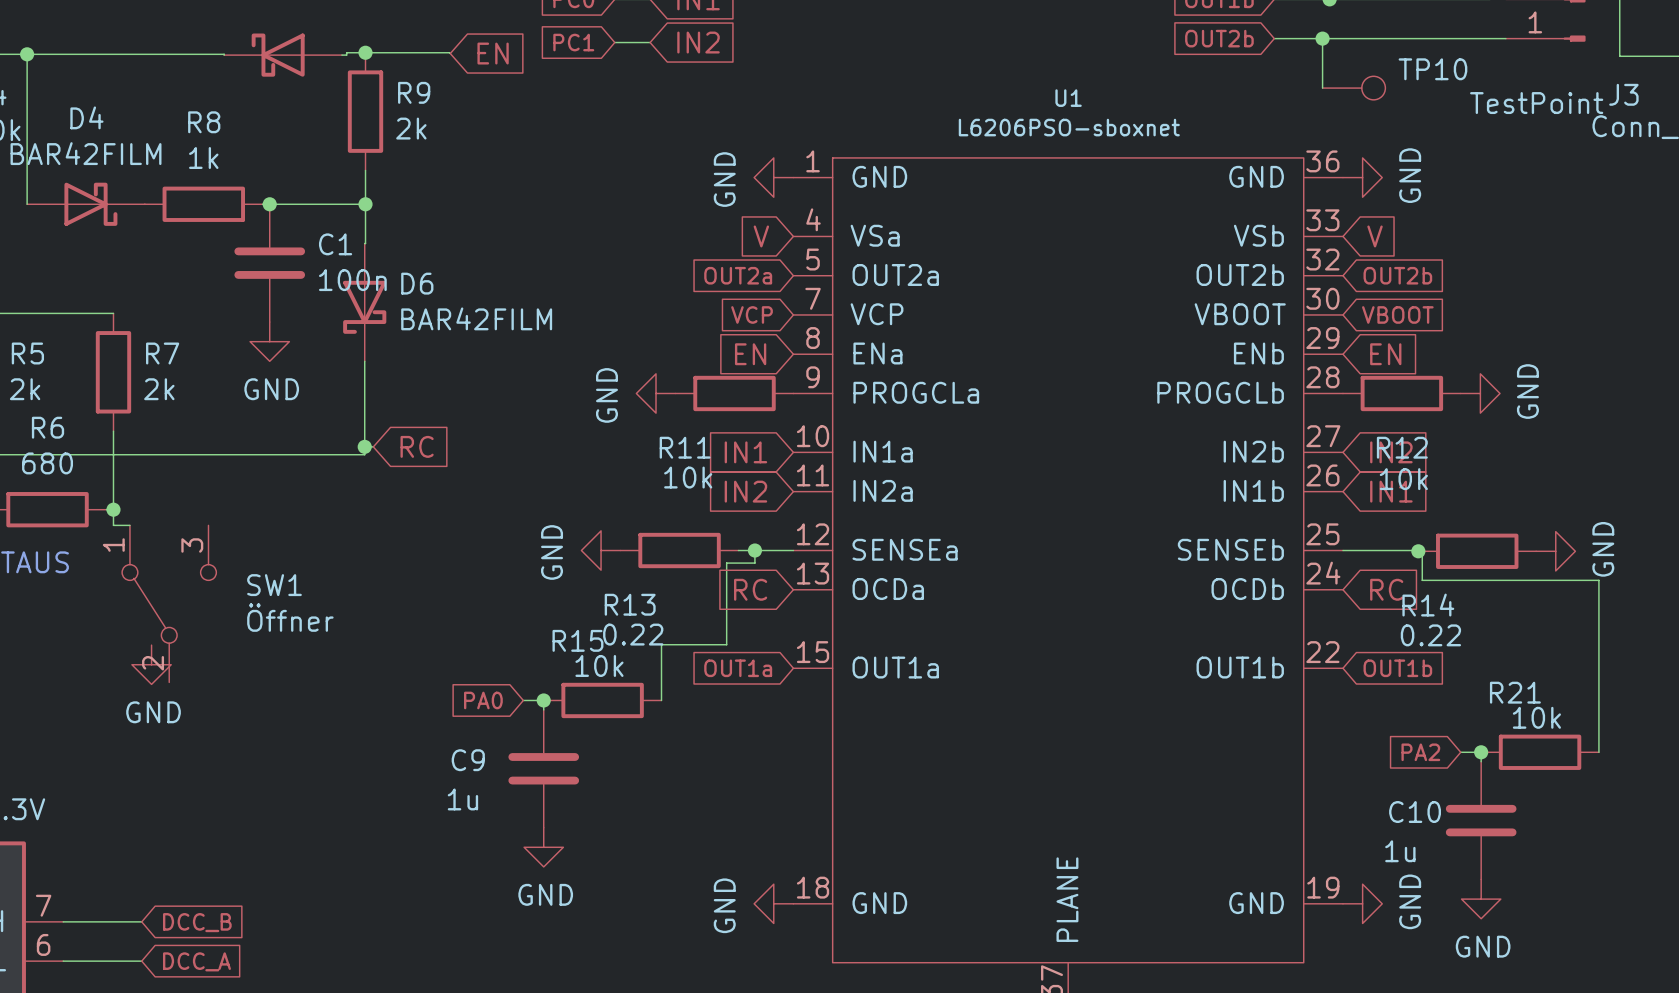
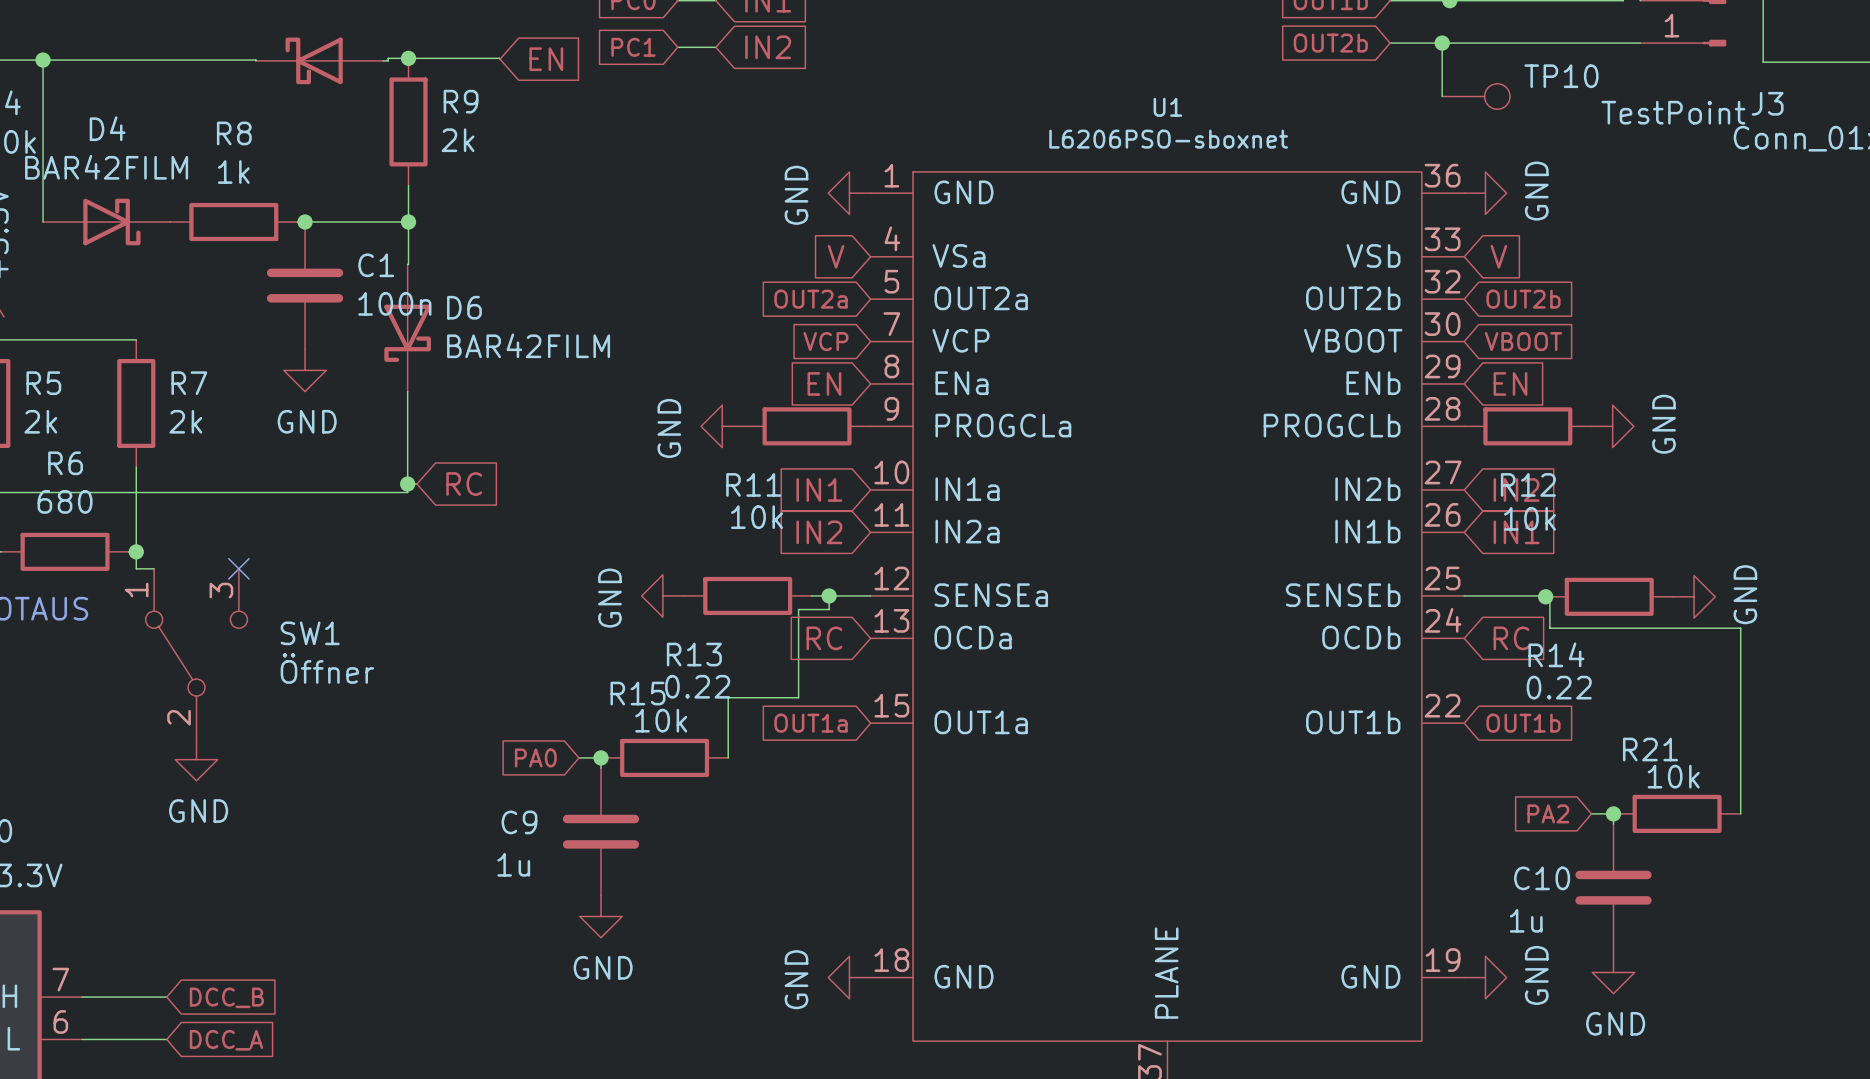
no-connect mark: none -> (238, 568)
power symbol position: GND (151, 664) -> GND (196, 759)

